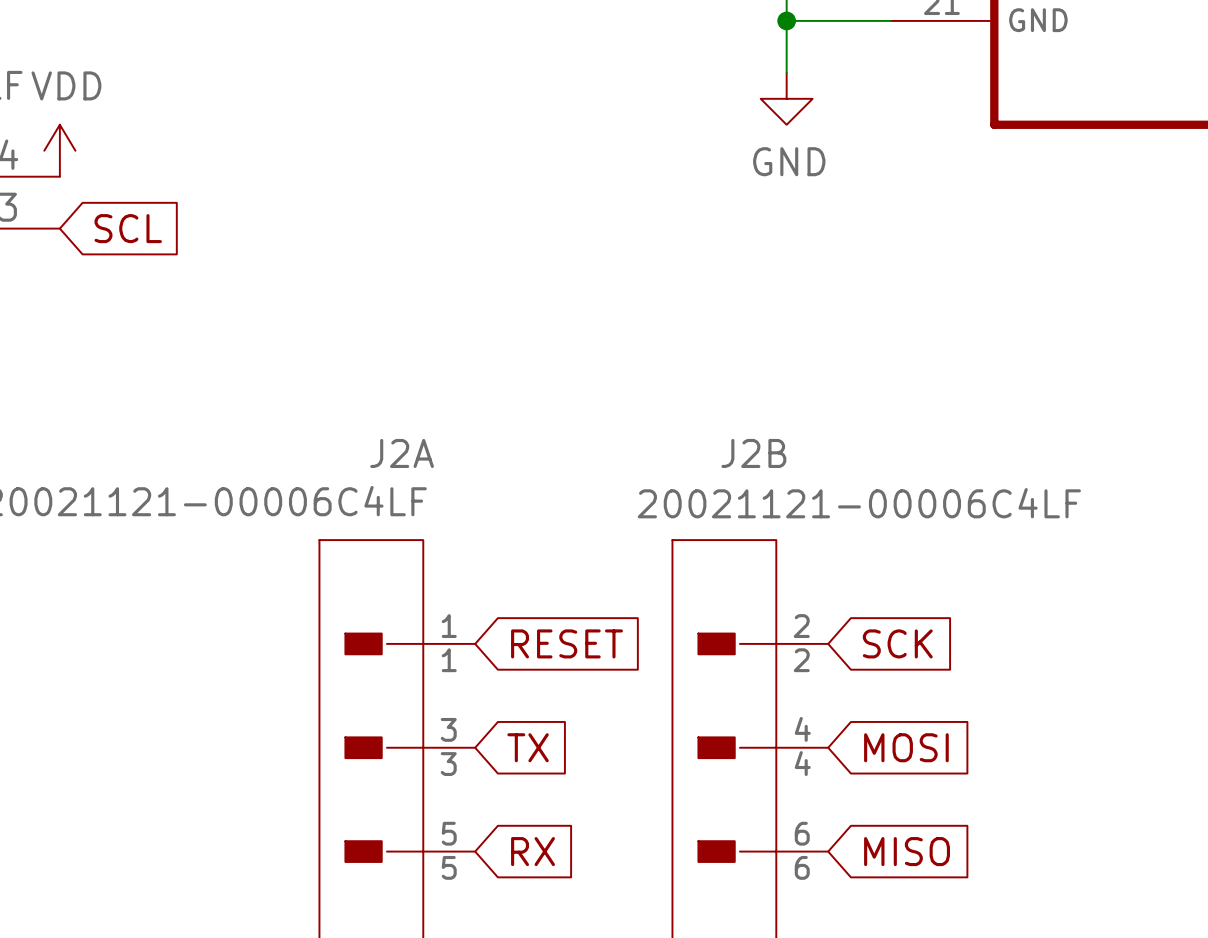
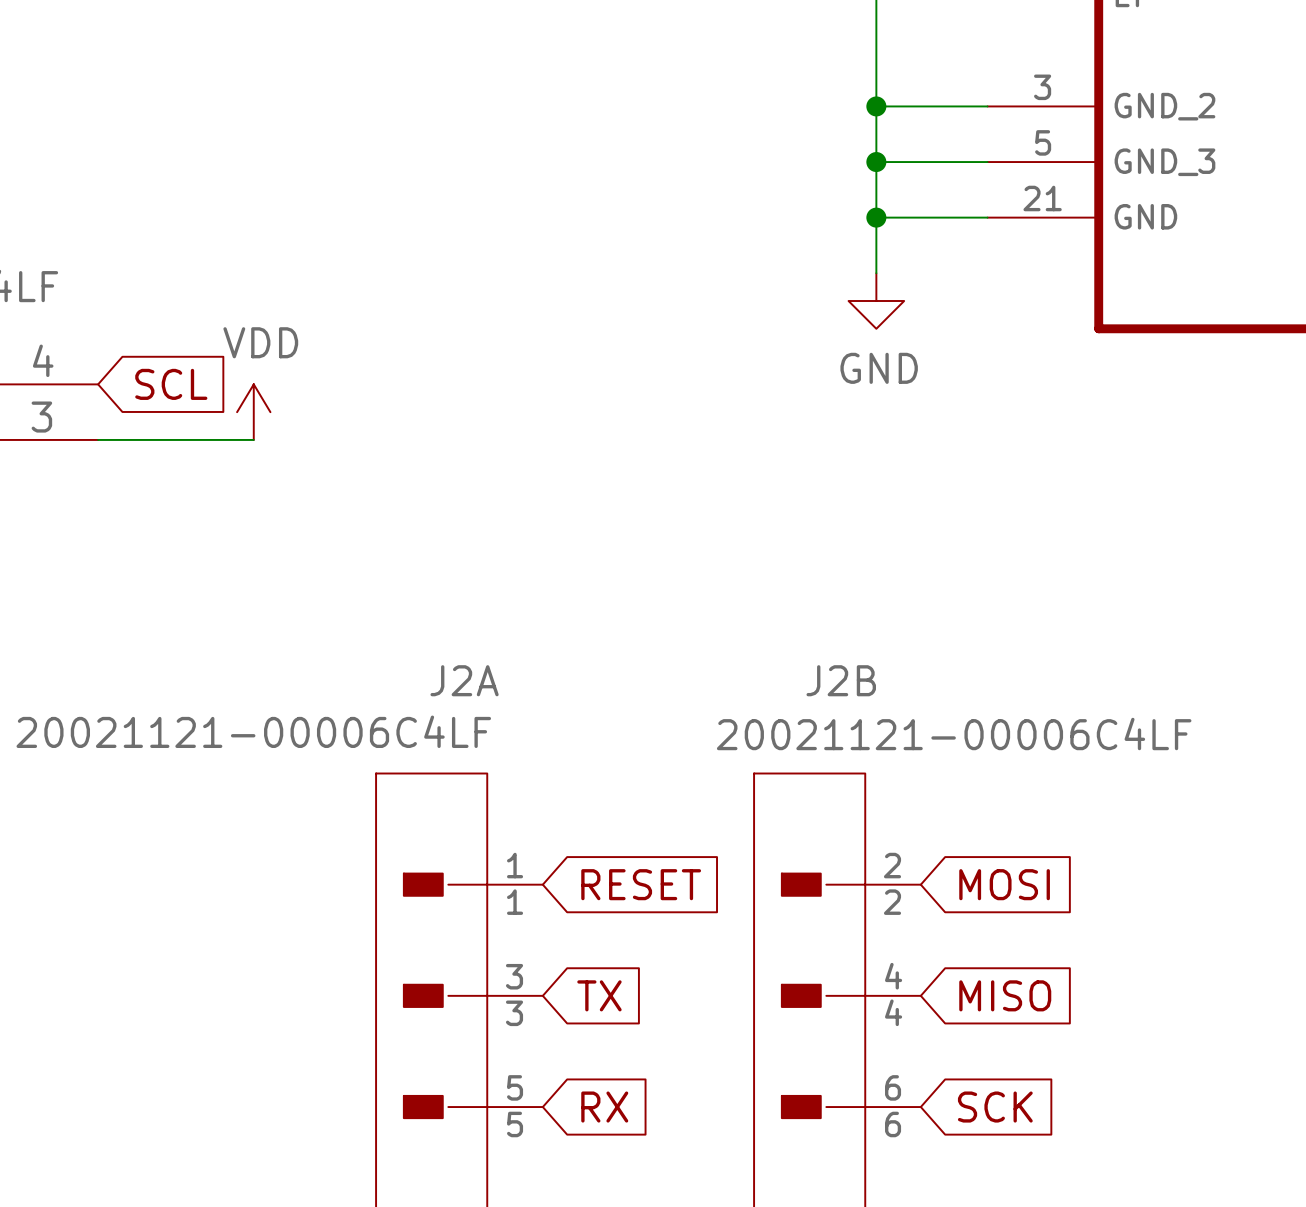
power symbol position: VDD (59, 150) -> VDD (253, 412)
wire: none -> (98, 439) (253, 439)
global label position: SCL (128, 228) -> SCL (171, 384)
global label: SCK (897, 643) -> MOSI (1004, 884)
global label: MOSI (906, 747) -> MISO (1005, 995)
global label: MISO (907, 851) -> SCK (995, 1107)

